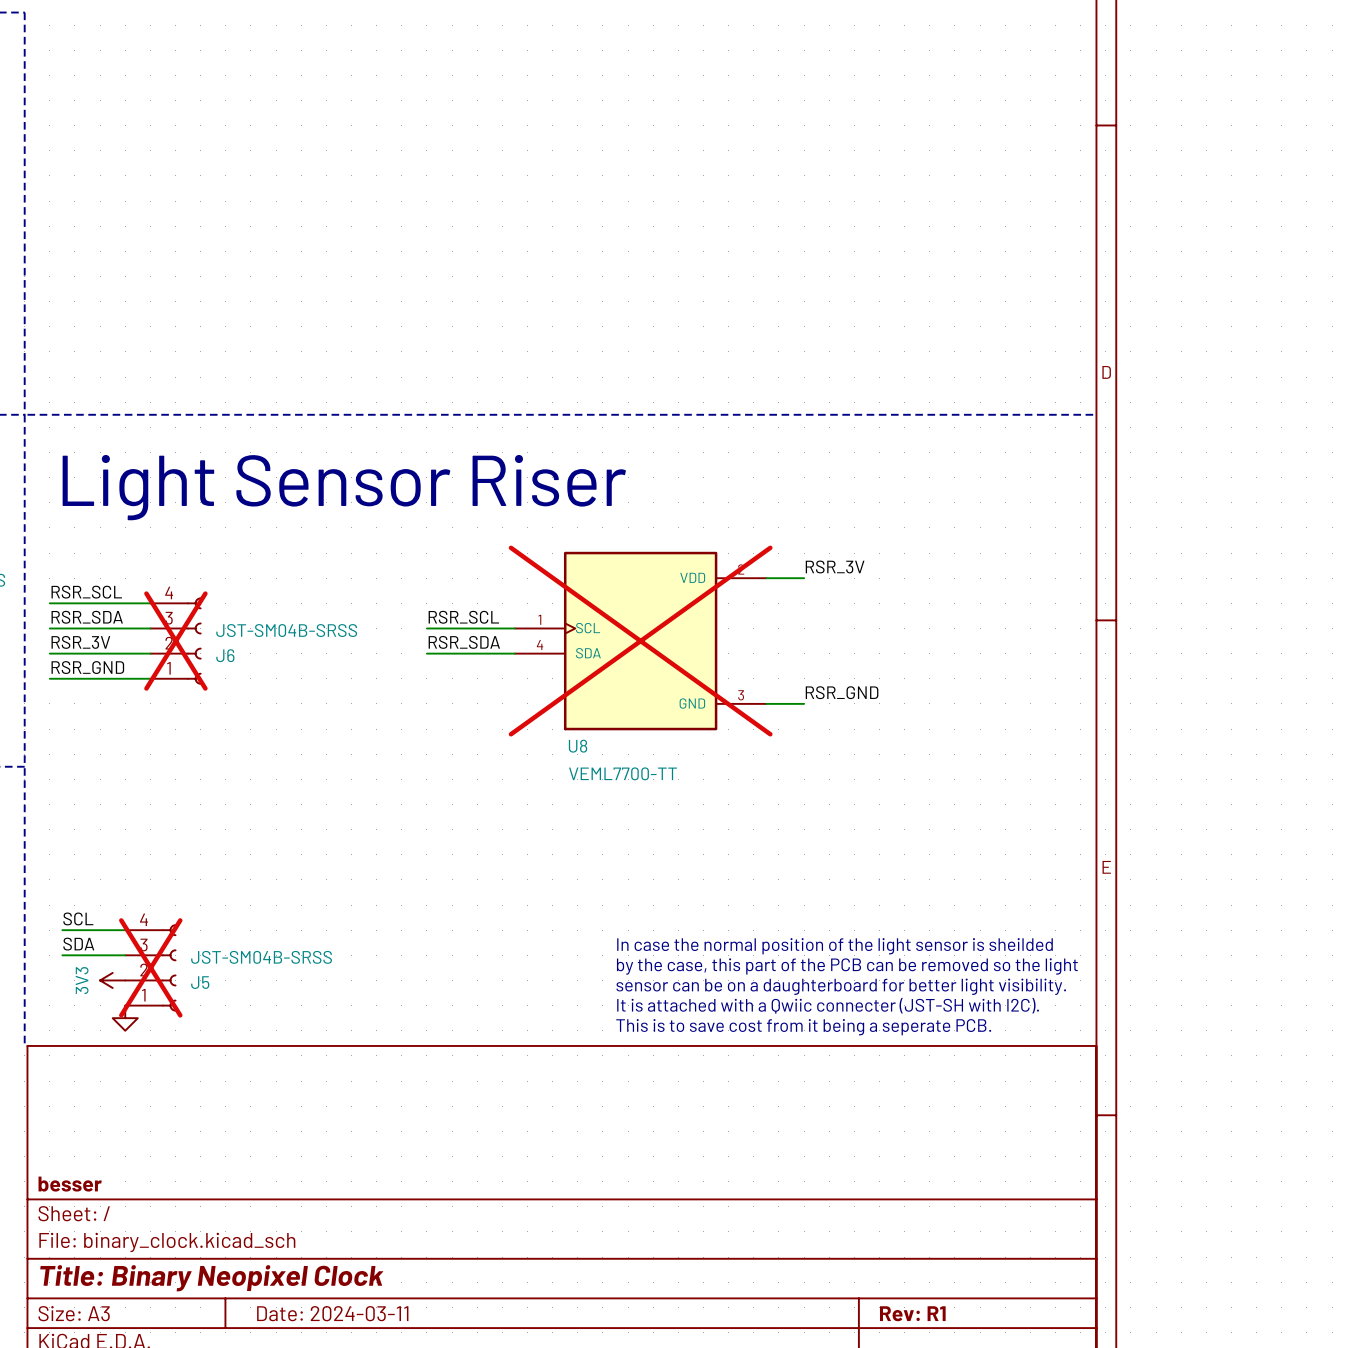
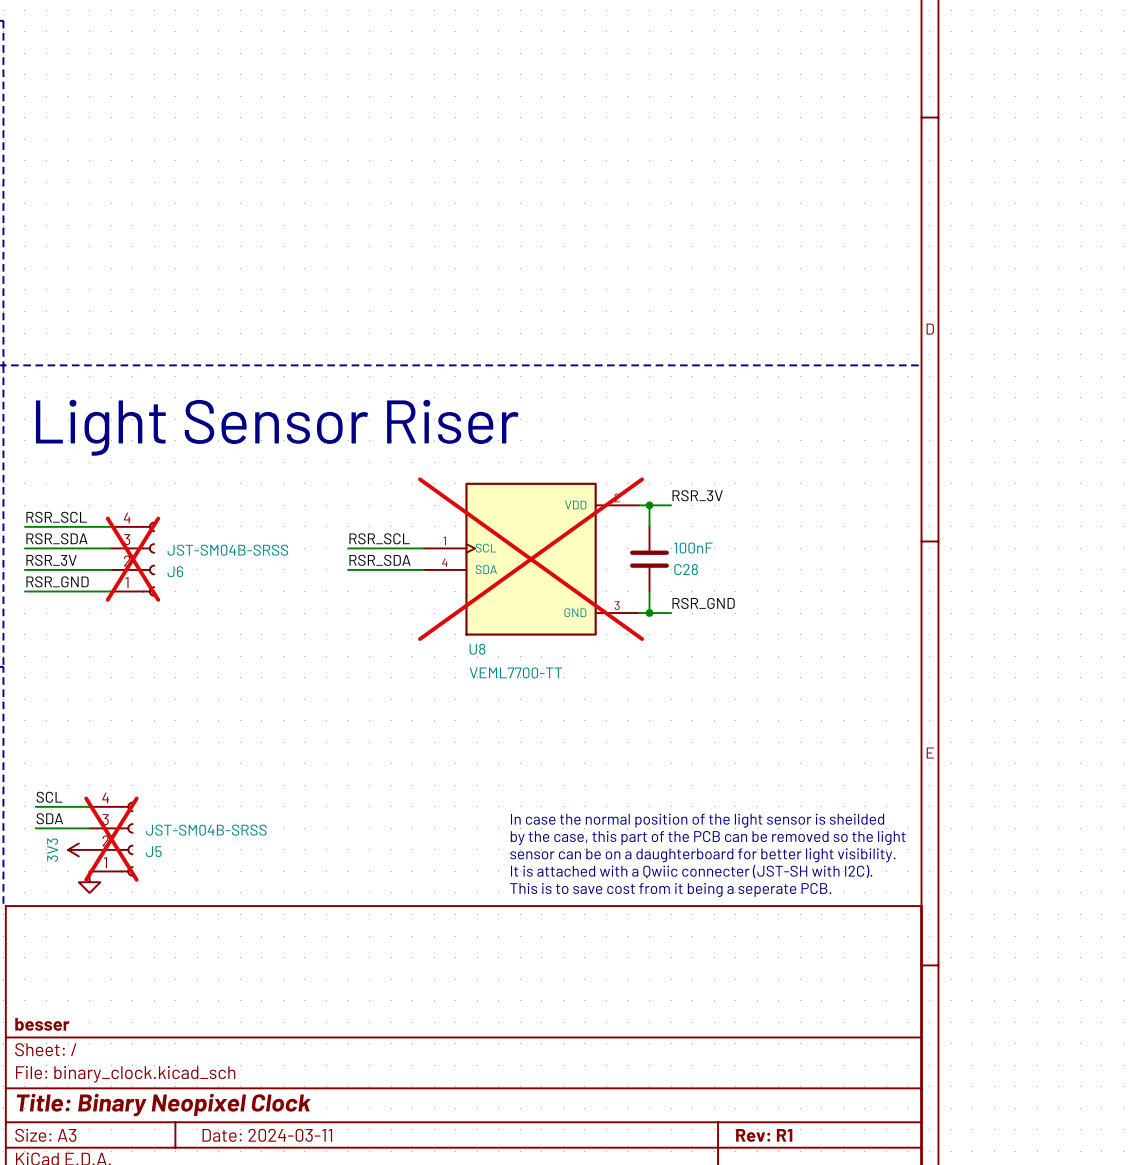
wire: none -> (649, 505) (649, 526)
junction: none -> (649, 505)
C28: none -> 100nF (649, 559)
wire: none -> (649, 591) (649, 613)
junction: none -> (649, 613)

